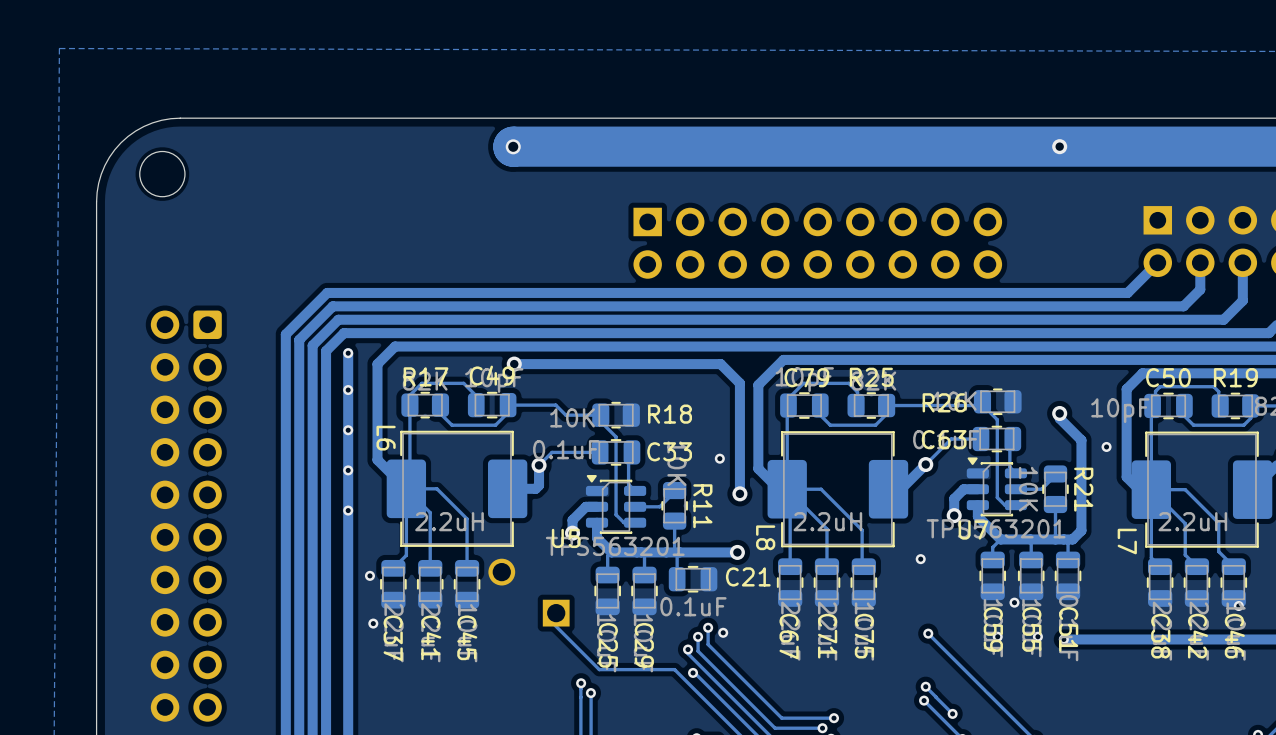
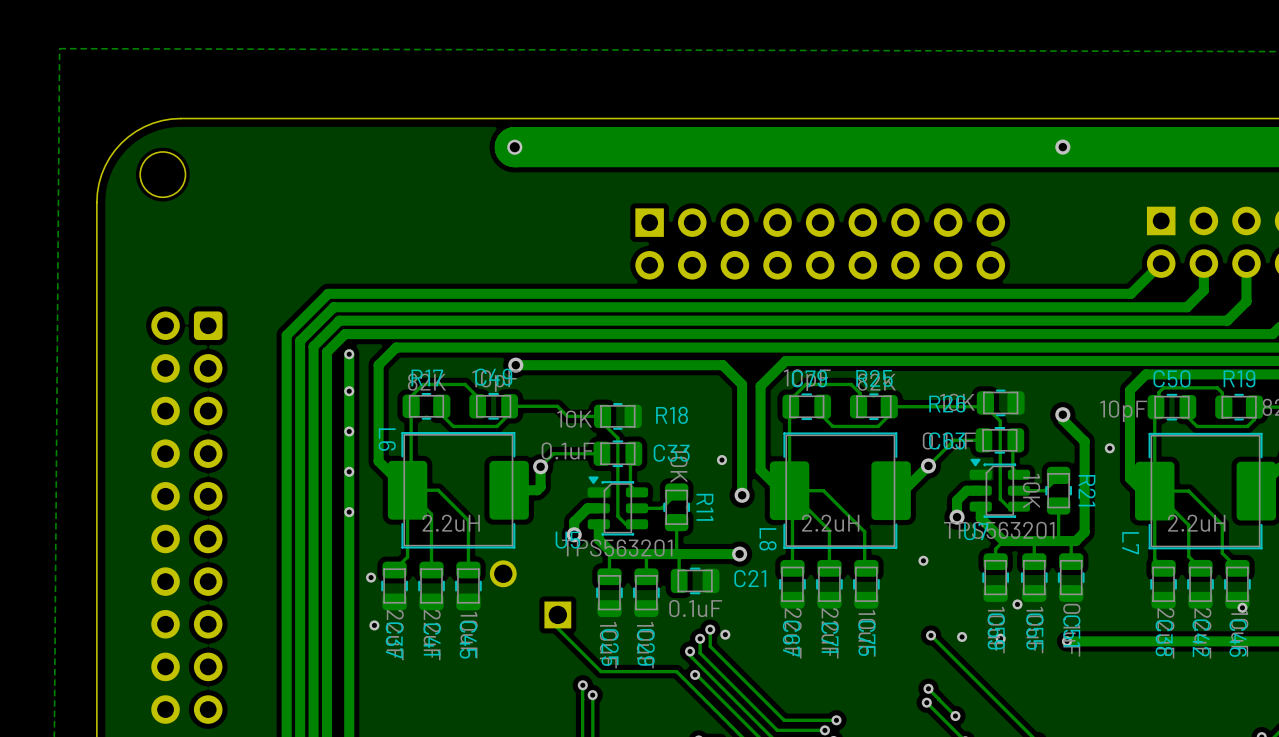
via position: (1037, 636) -> (962, 636)

